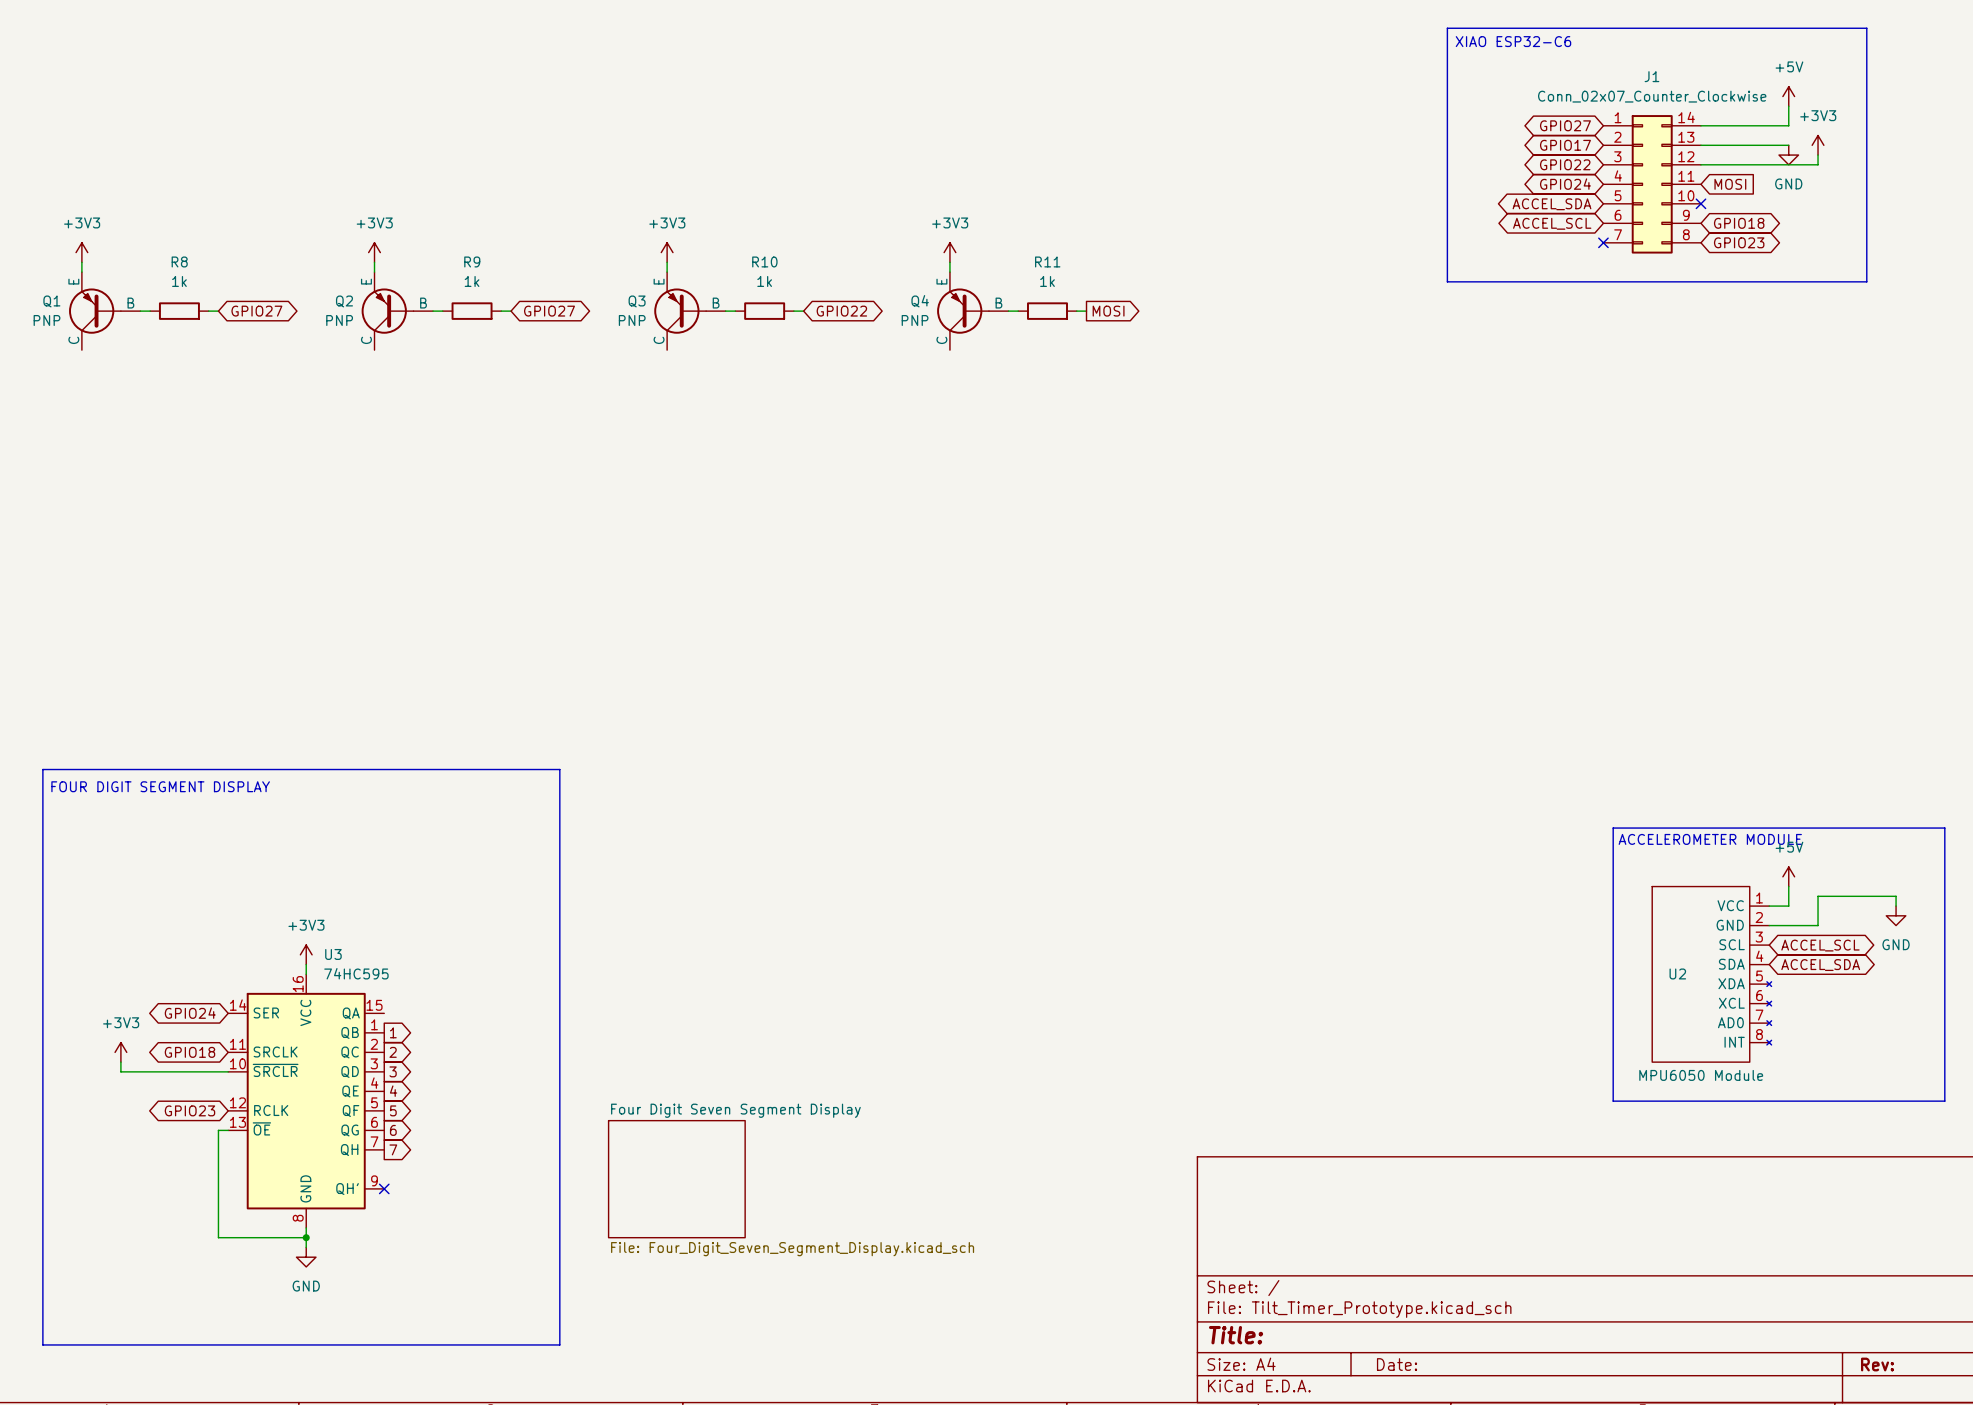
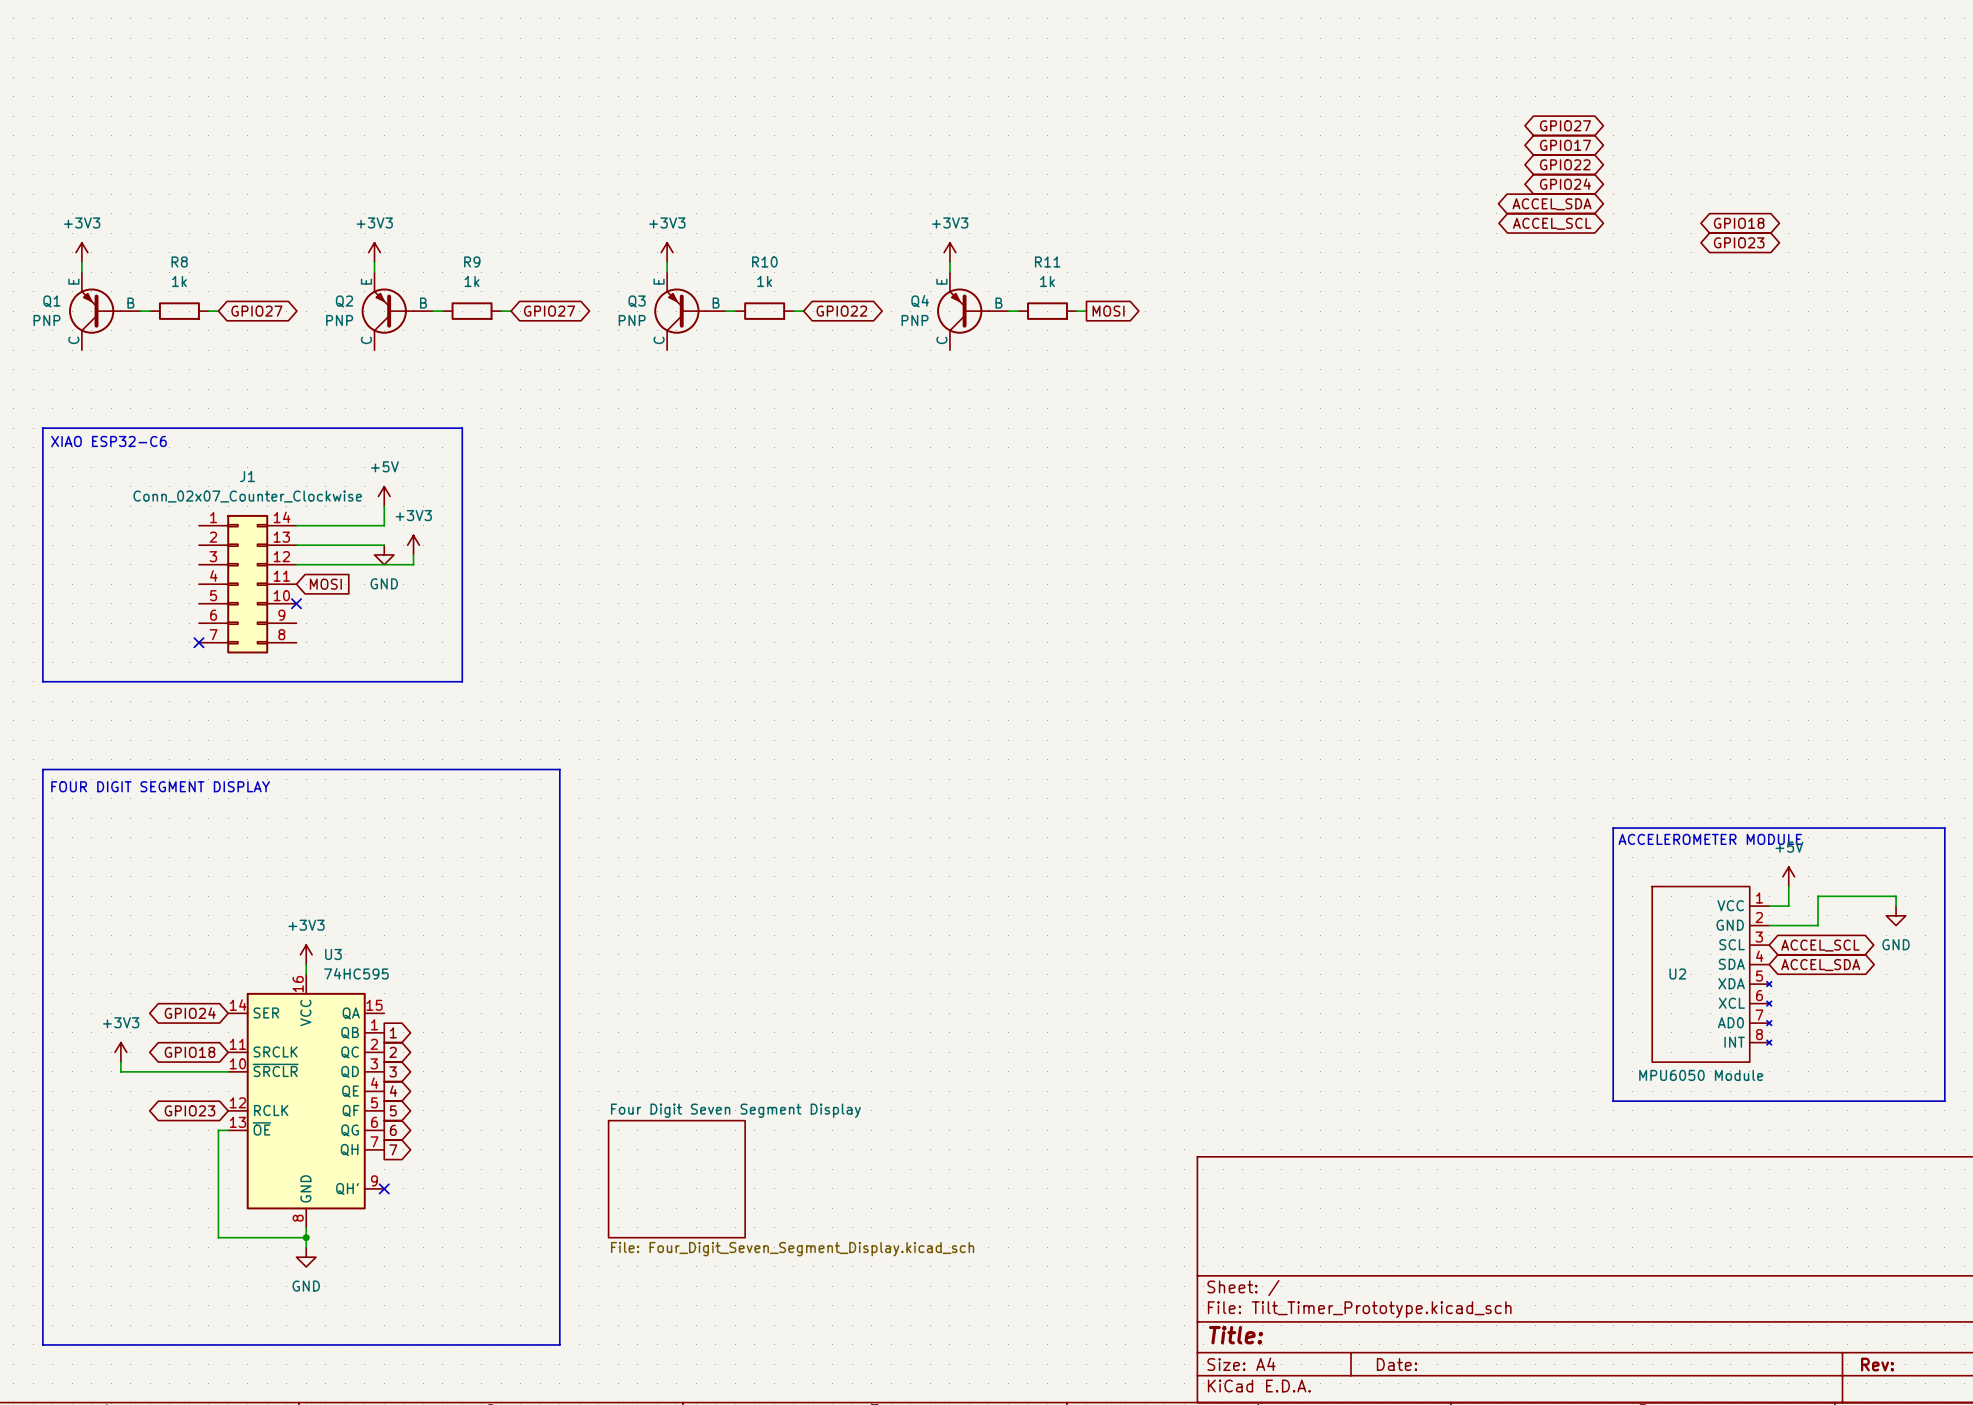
line: (1447, 28) (1866, 28) (1866, 281) (1447, 281) (1447, 28) -> none
text: XIAO ESP32-C6 (1513, 41) -> none
power symbol: +5V (1788, 96) -> none
wire: (1788, 106) (1788, 125) (1700, 125) -> none
wire: (1700, 145) (1788, 145) -> none
power symbol: +3V3 (1818, 145) -> none
power symbol: GND (1788, 155) -> none
wire: (1818, 155) (1818, 164) (1700, 164) -> none
J1 position: (1652, 184) -> (247, 584)
global label: MOSI (1730, 184) -> none
no-connect mark: (1700, 203) -> none
no-connect mark: (1603, 242) -> none
line: none -> (42, 428) (462, 428) (462, 681) (42, 681) (42, 428)
text: none -> XIAO ESP32-C6 (108, 441)
power symbol: none -> +5V (384, 496)
wire: none -> (384, 506) (384, 525) (296, 525)
wire: none -> (296, 545) (384, 545)
power symbol: none -> +3V3 (413, 545)
power symbol: none -> GND (384, 554)
wire: none -> (413, 554) (413, 564) (296, 564)
global label: none -> MOSI (325, 584)
no-connect mark: none -> (296, 603)
no-connect mark: none -> (198, 642)

